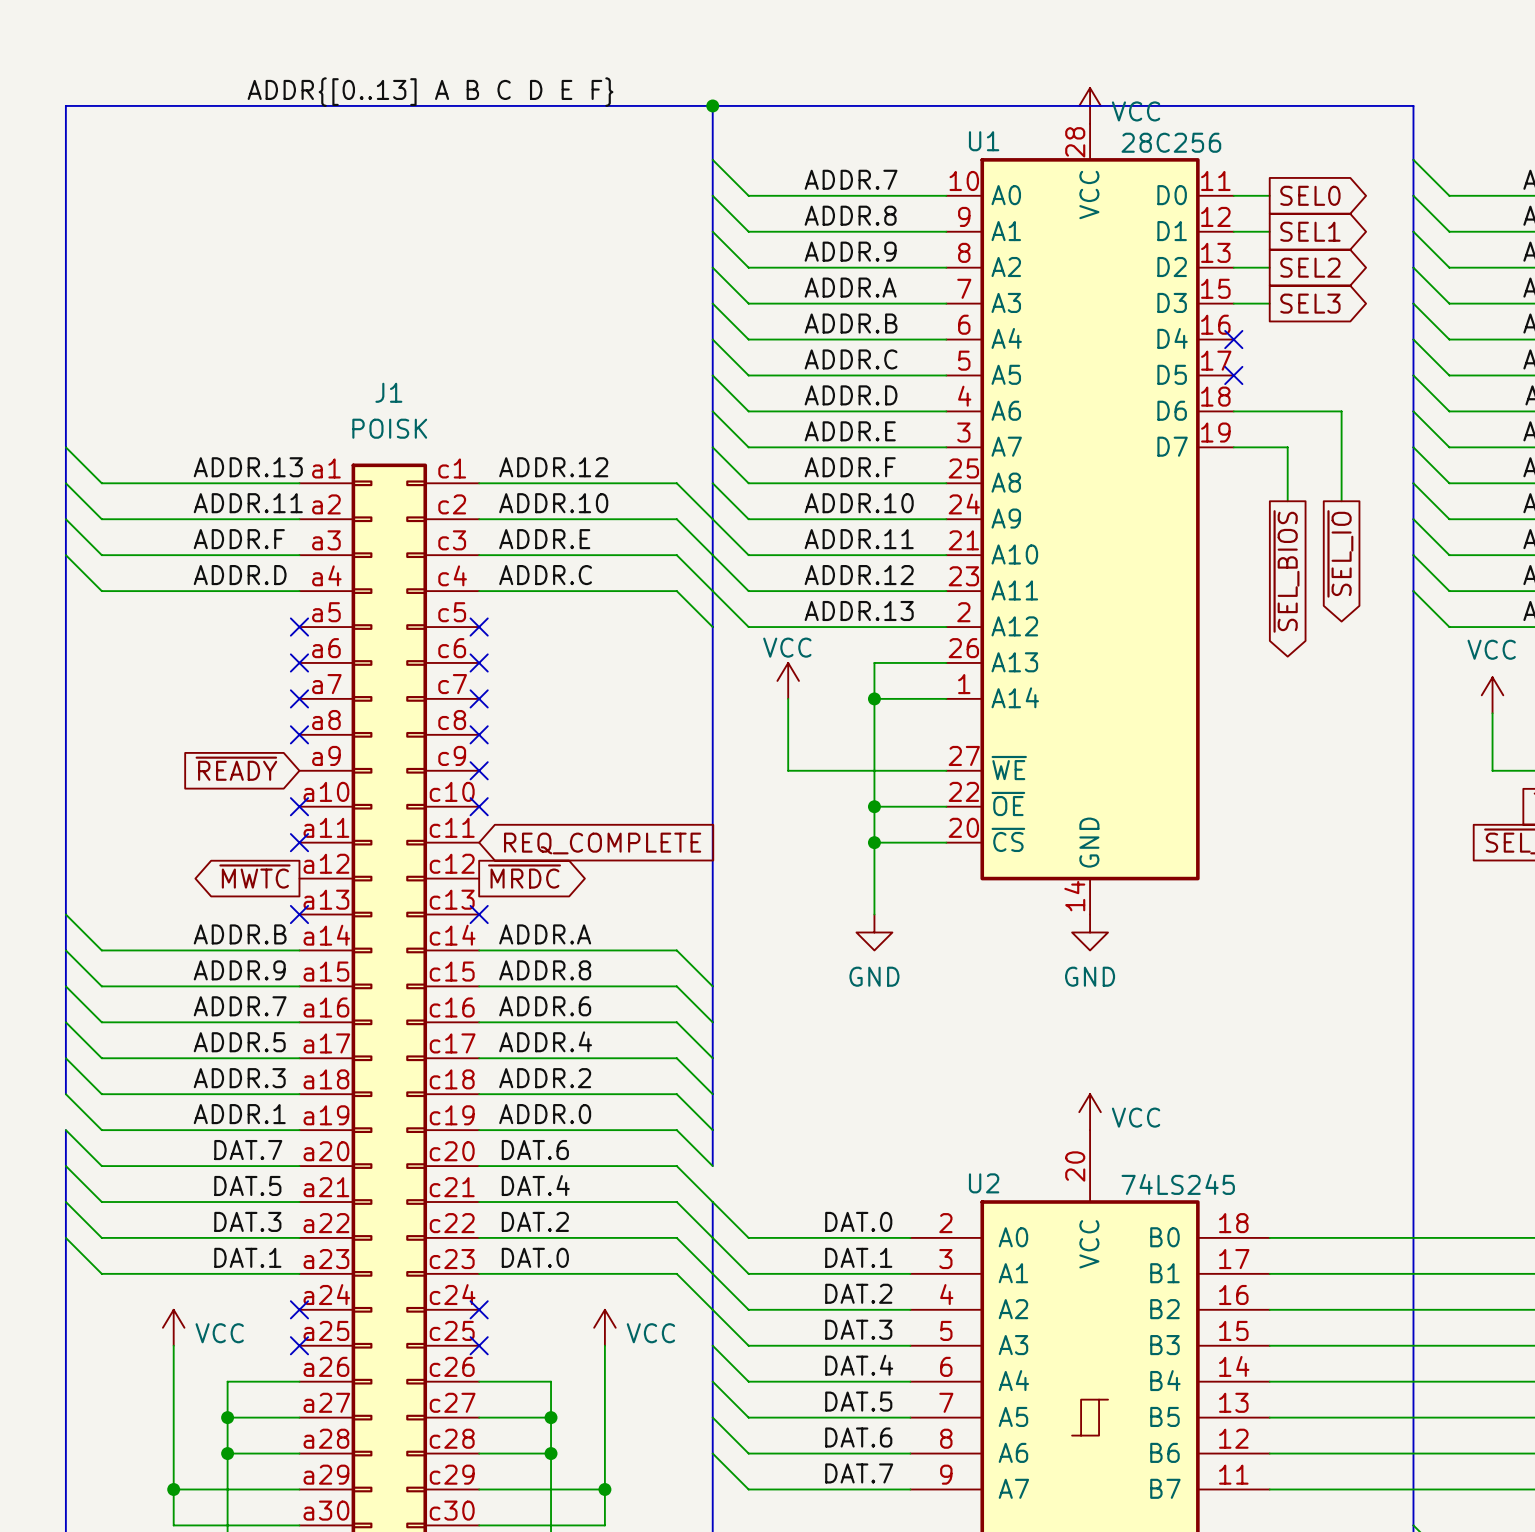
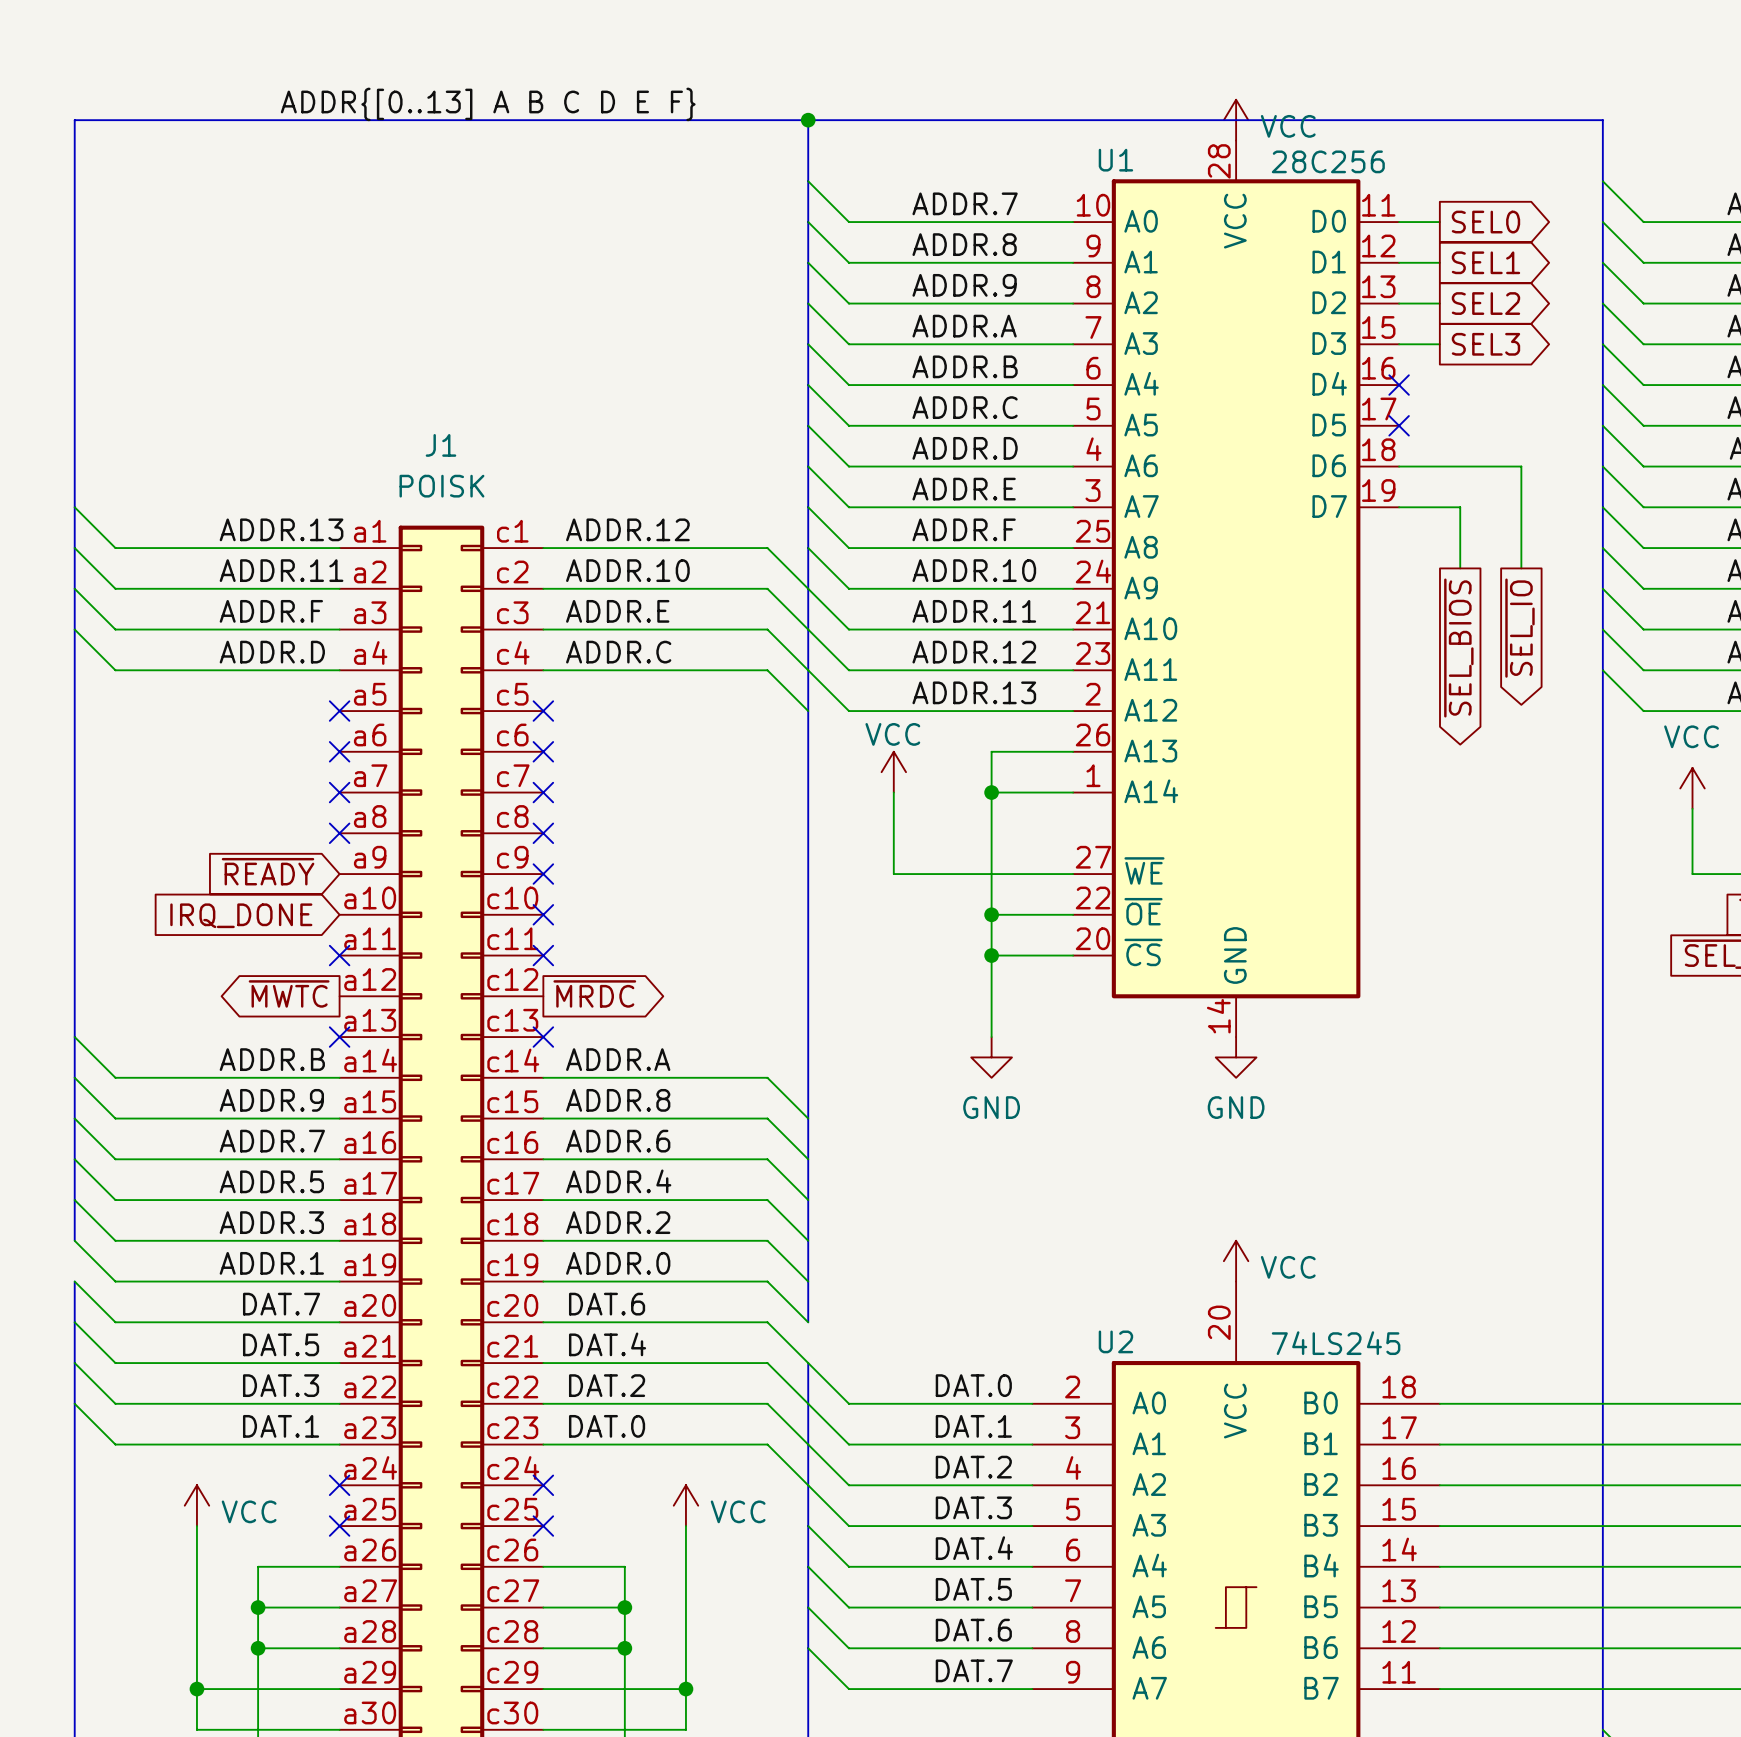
no-connect mark: (299, 806) -> none
global label: none -> IRQ_DONE (241, 915)
no-connect mark: none -> (543, 955)
global label: REQ_COMPLETE (602, 843) -> none

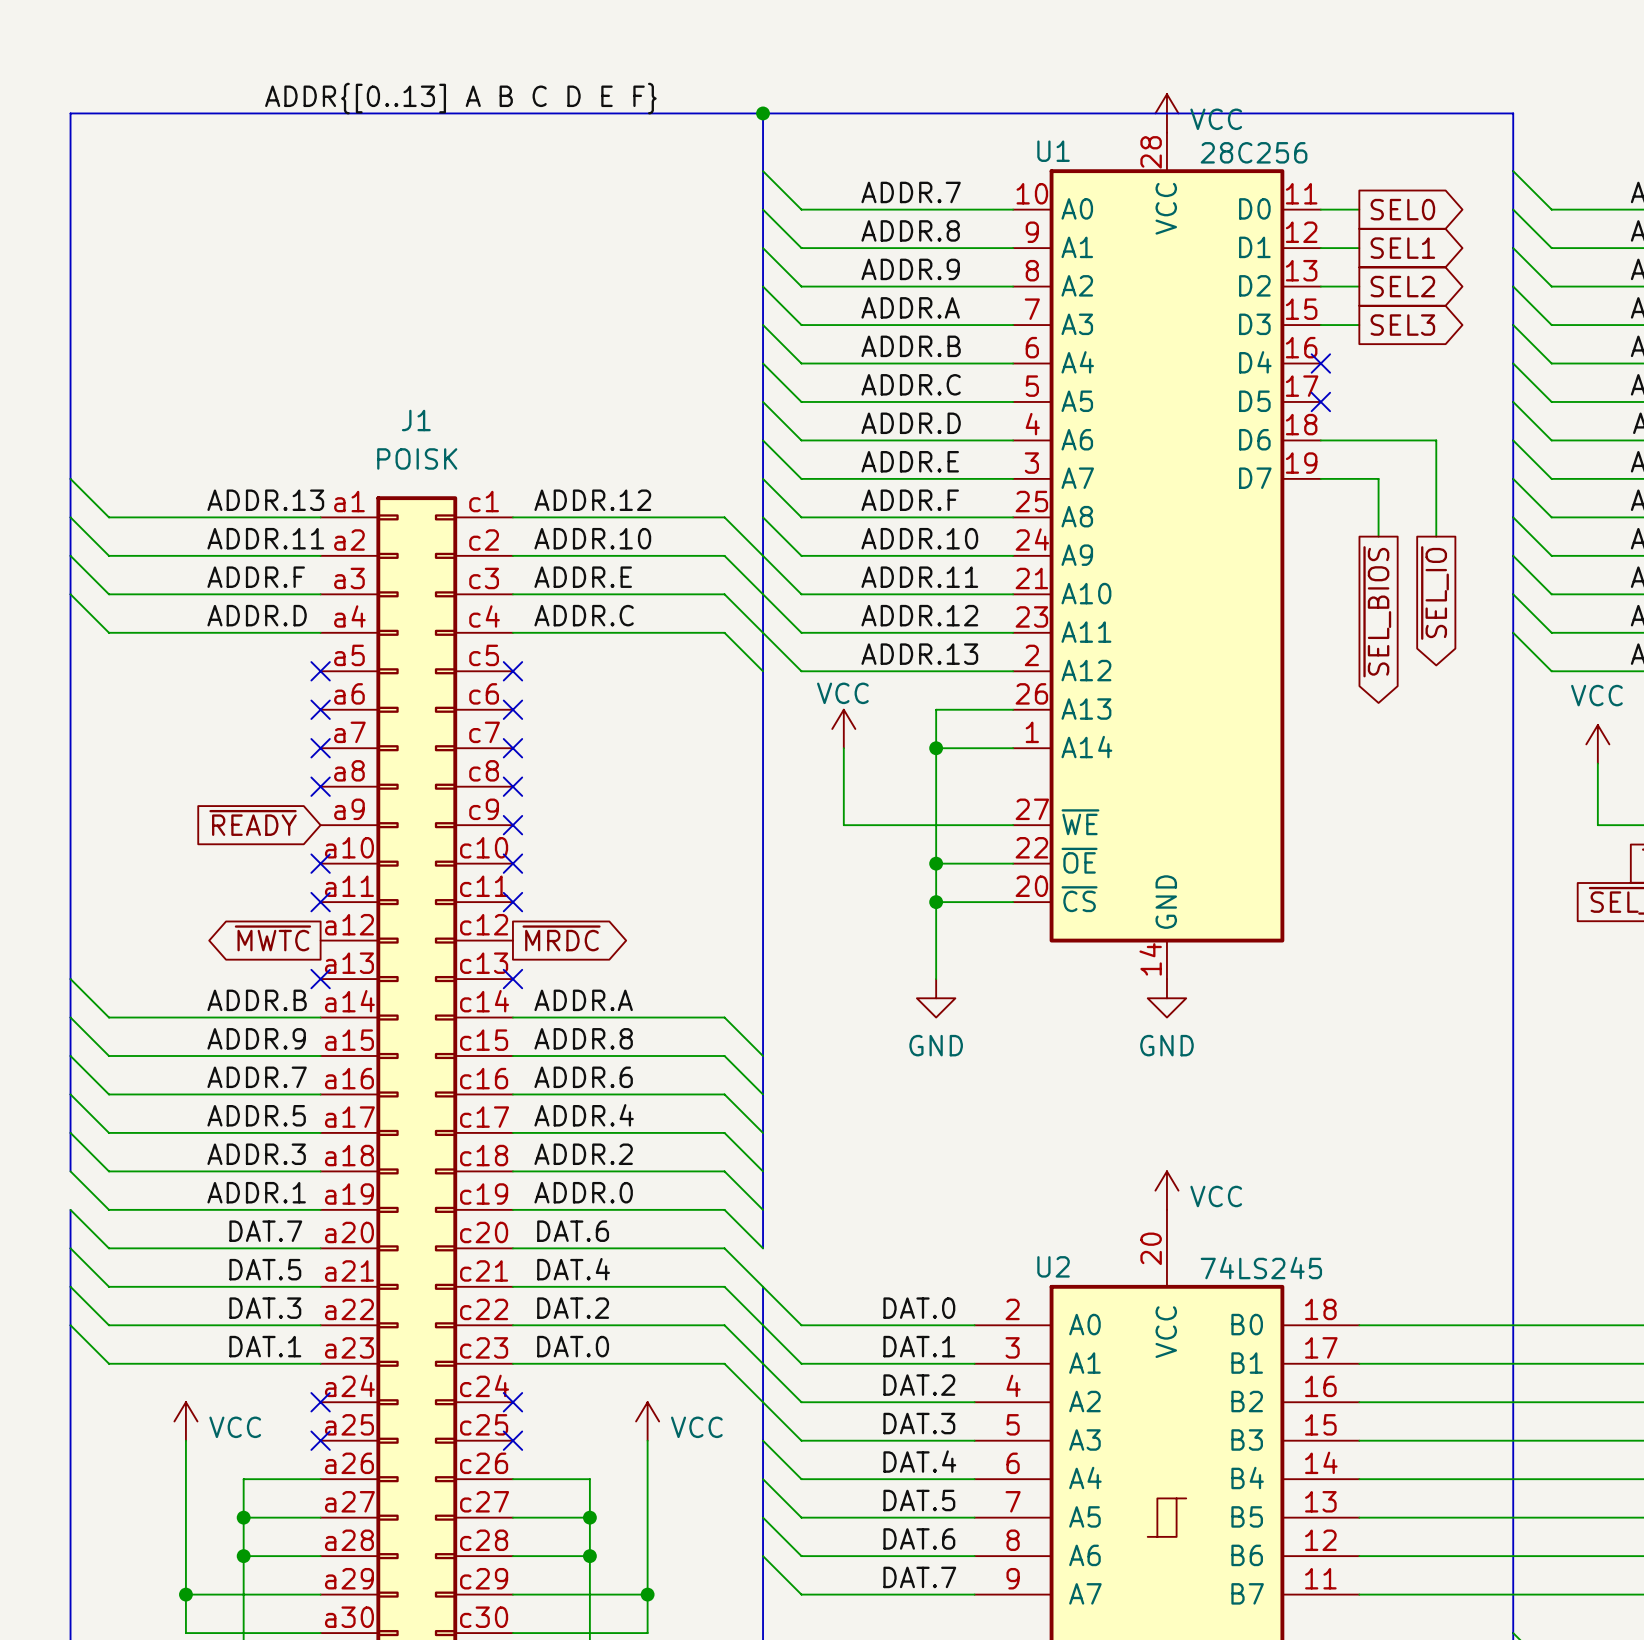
no-connect mark: none -> (320, 863)
global label: IRQ_DONE (241, 915) -> none

